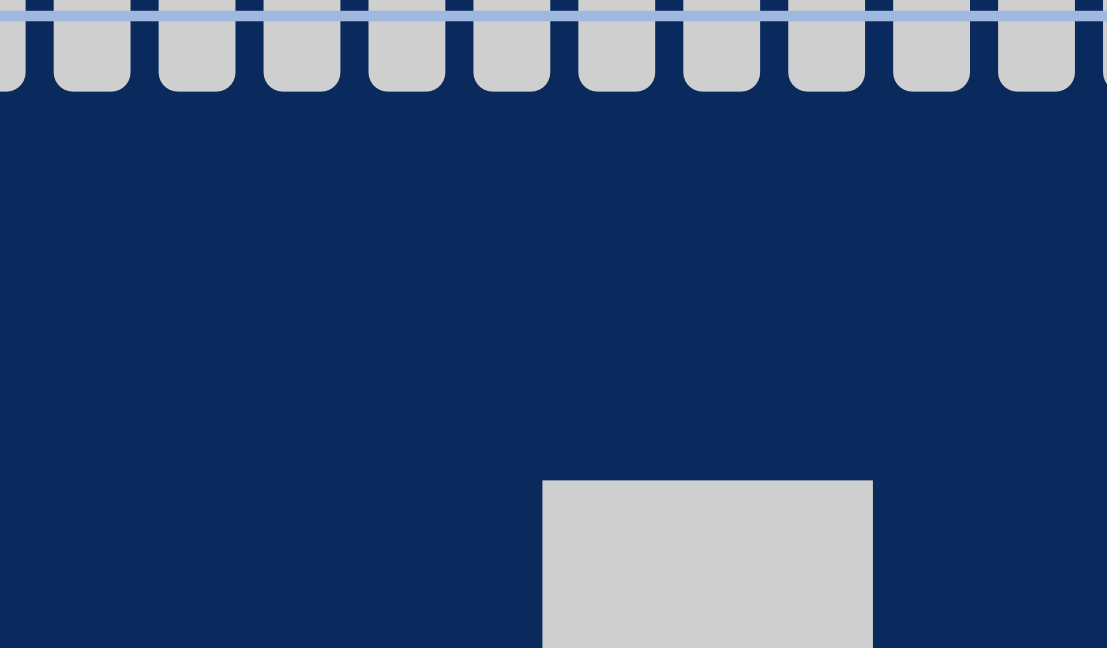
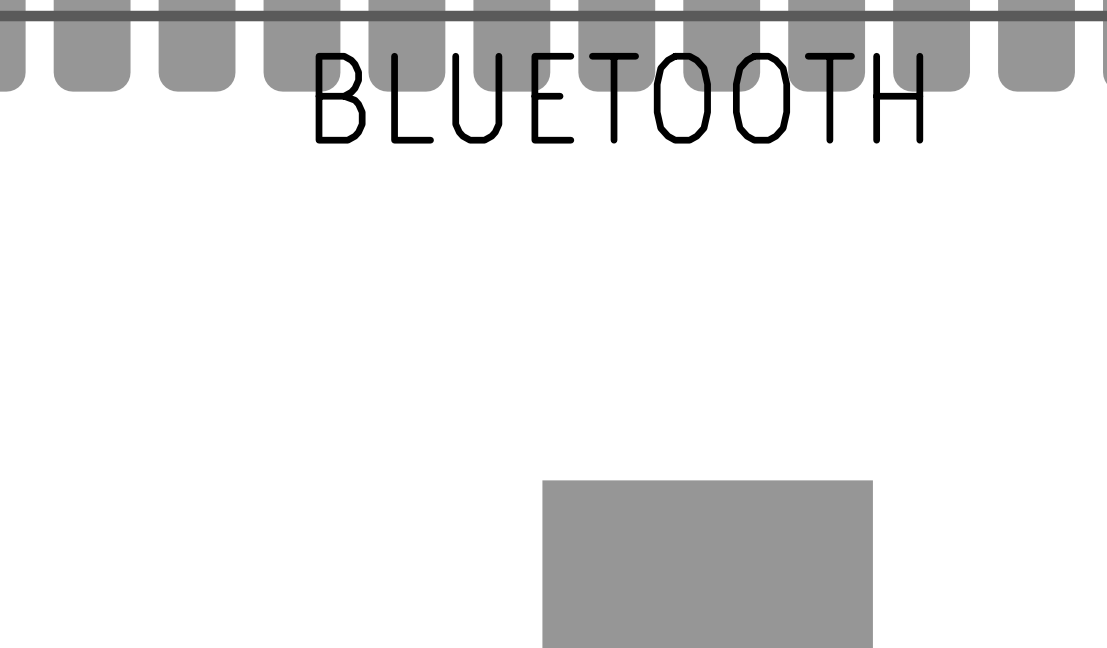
text: none -> BLUETOOTH (619, 98)

